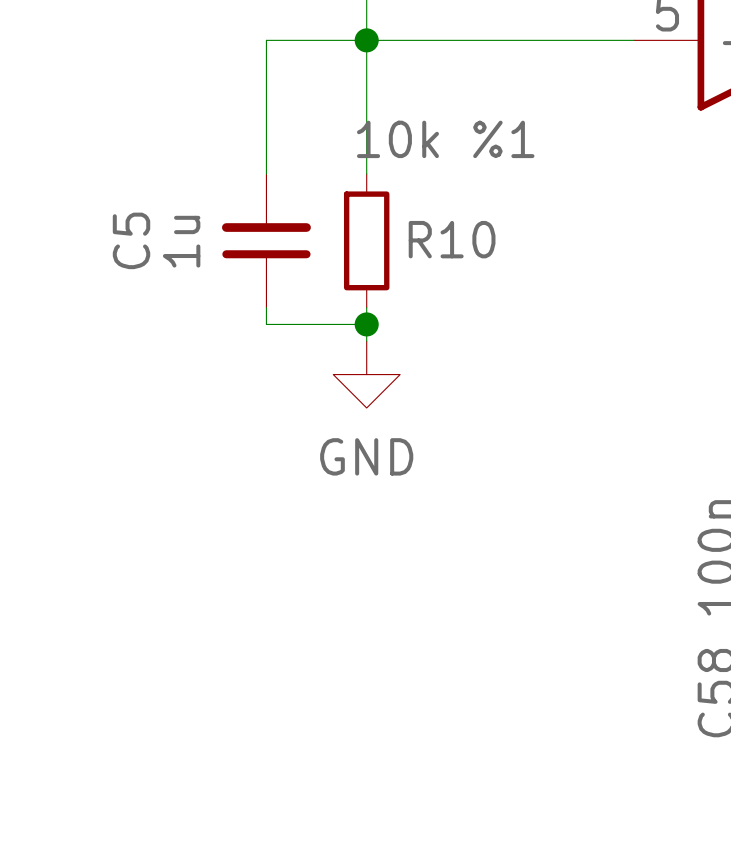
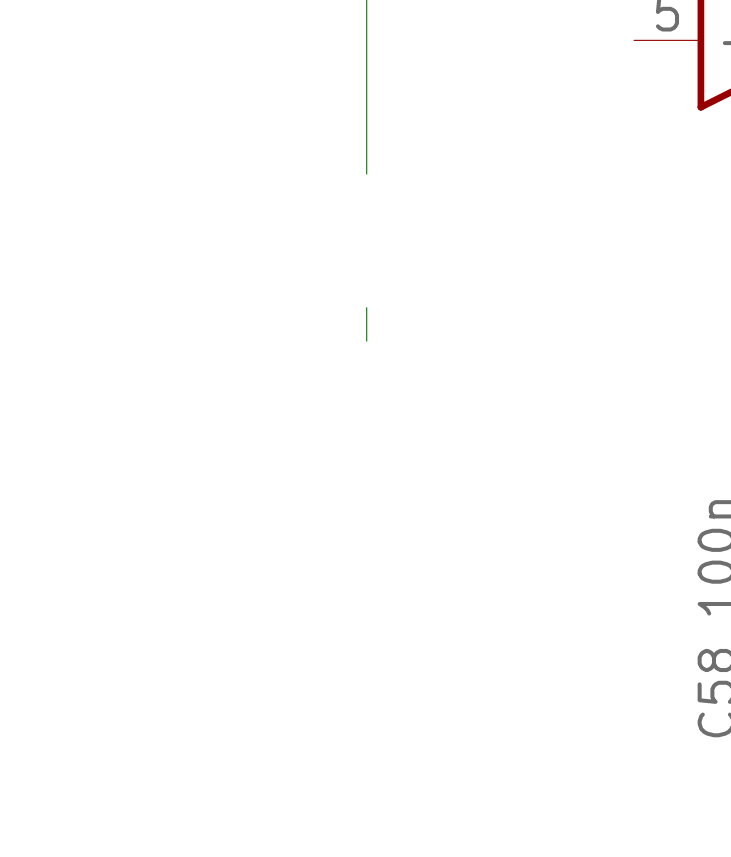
junction: (366, 40) -> none
wire: (634, 40) (266, 40) (266, 174) -> none
C5: 1u (266, 240) -> none
R10: 10k %1 (366, 240) -> none
wire: (266, 307) (266, 324) (366, 324) -> none
junction: (366, 324) -> none
power symbol: GND (366, 374) -> none

